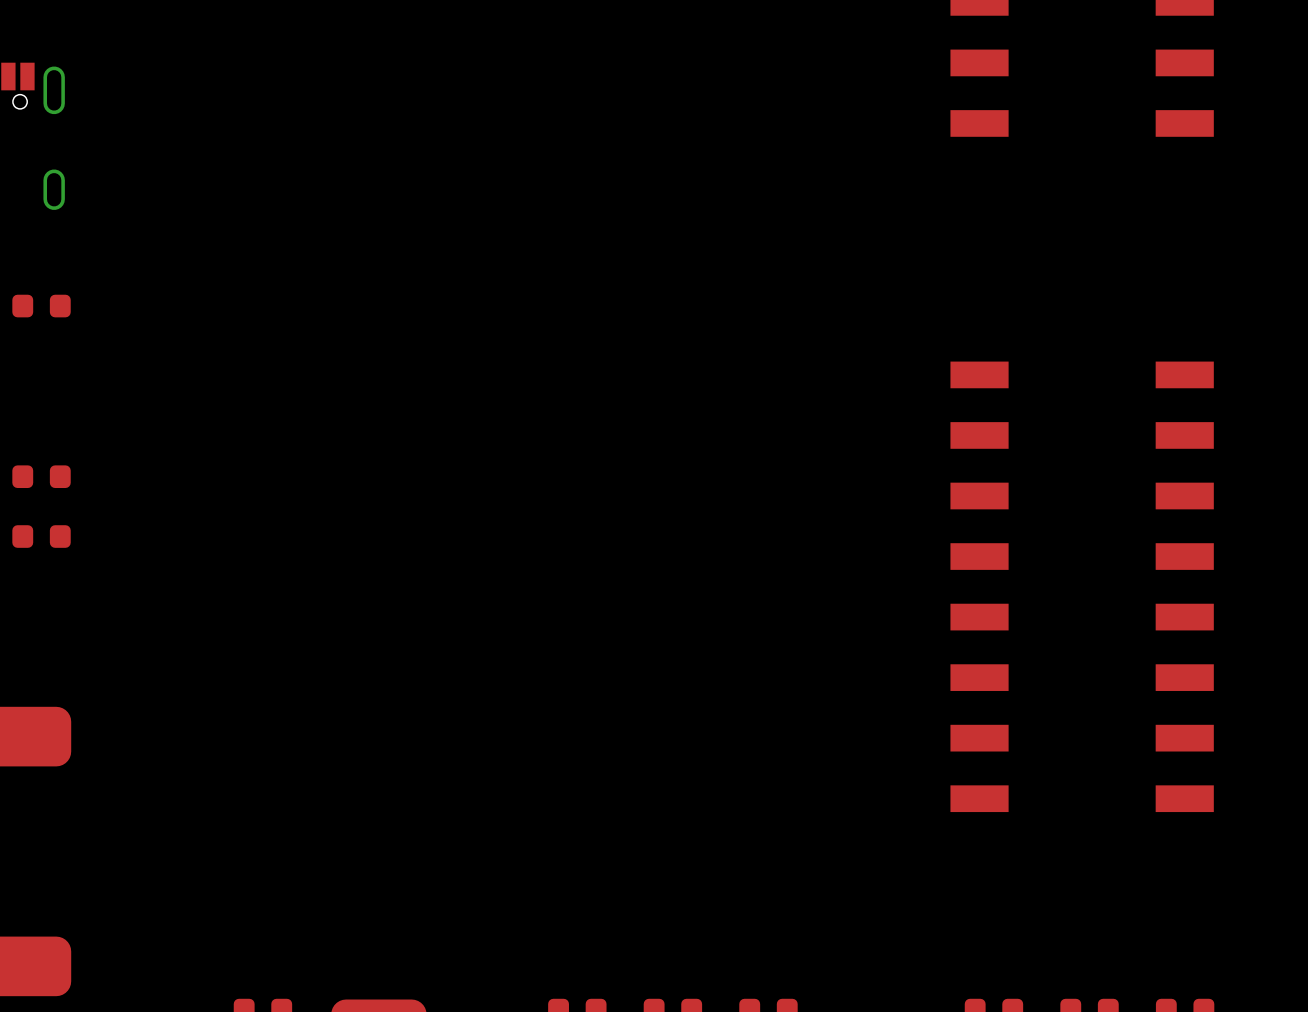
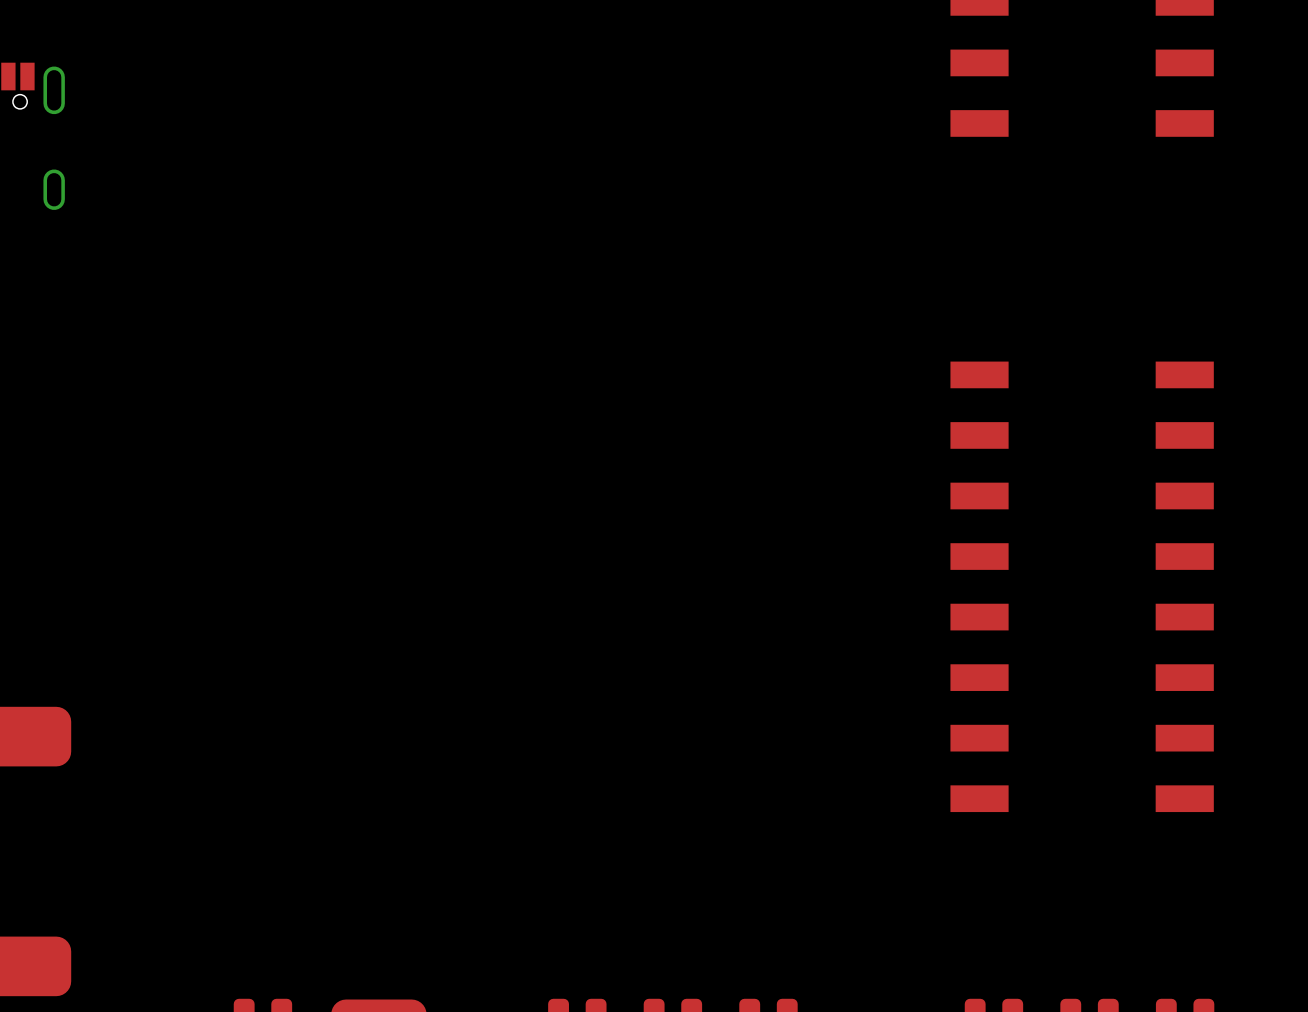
part: (41, 306) -> none
part: (41, 476) -> none
part: (41, 536) -> none

